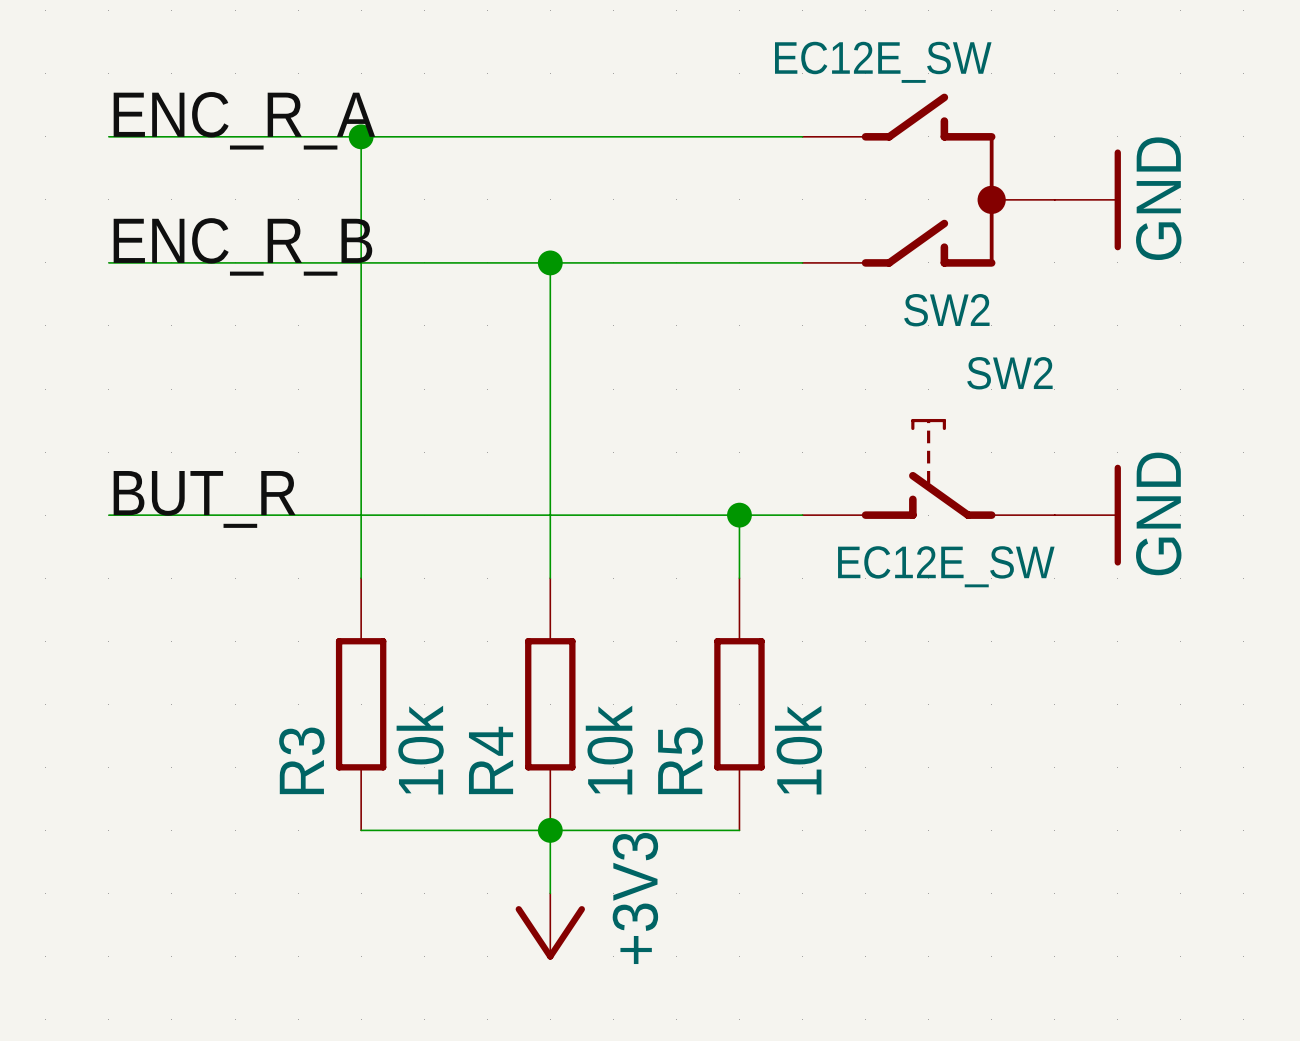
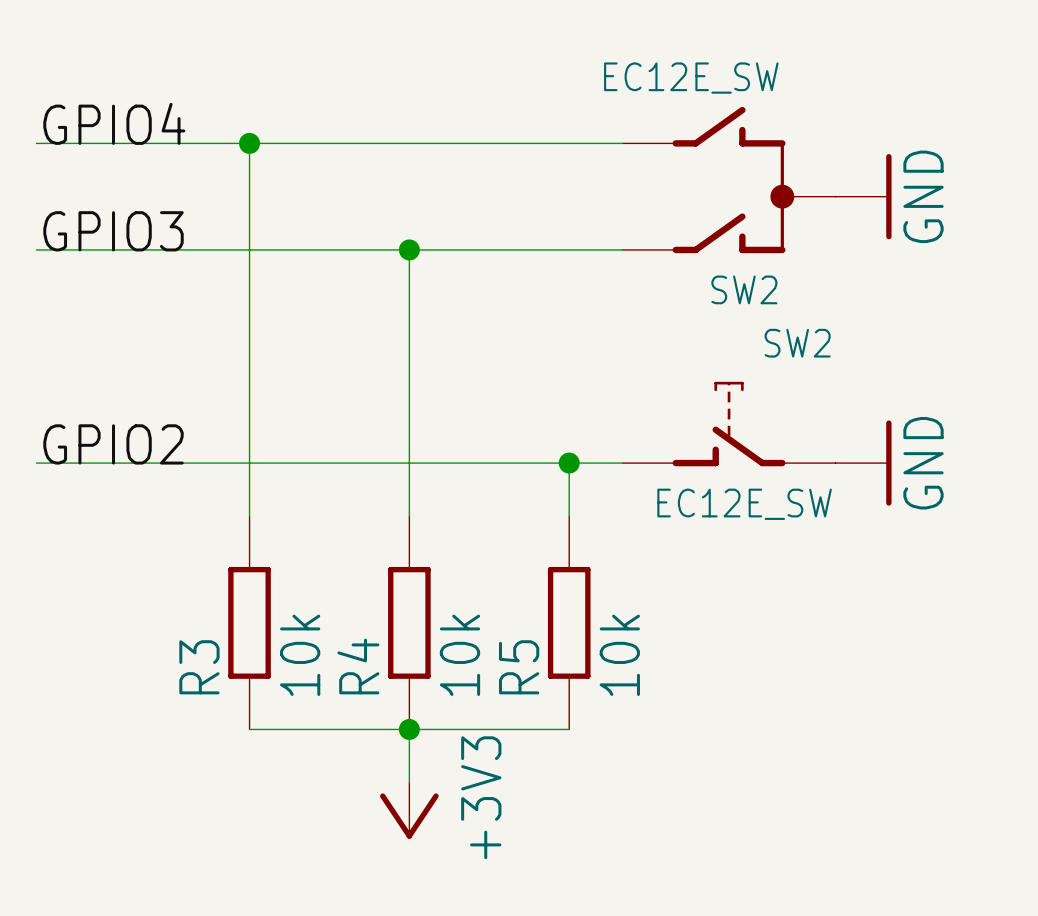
label: ENC_R_A (244, 120) -> GPIO4 (114, 123)
label: ENC_R_B (242, 246) -> GPIO3 (113, 231)
label: BUT_R (204, 499) -> GPIO2 (113, 444)

